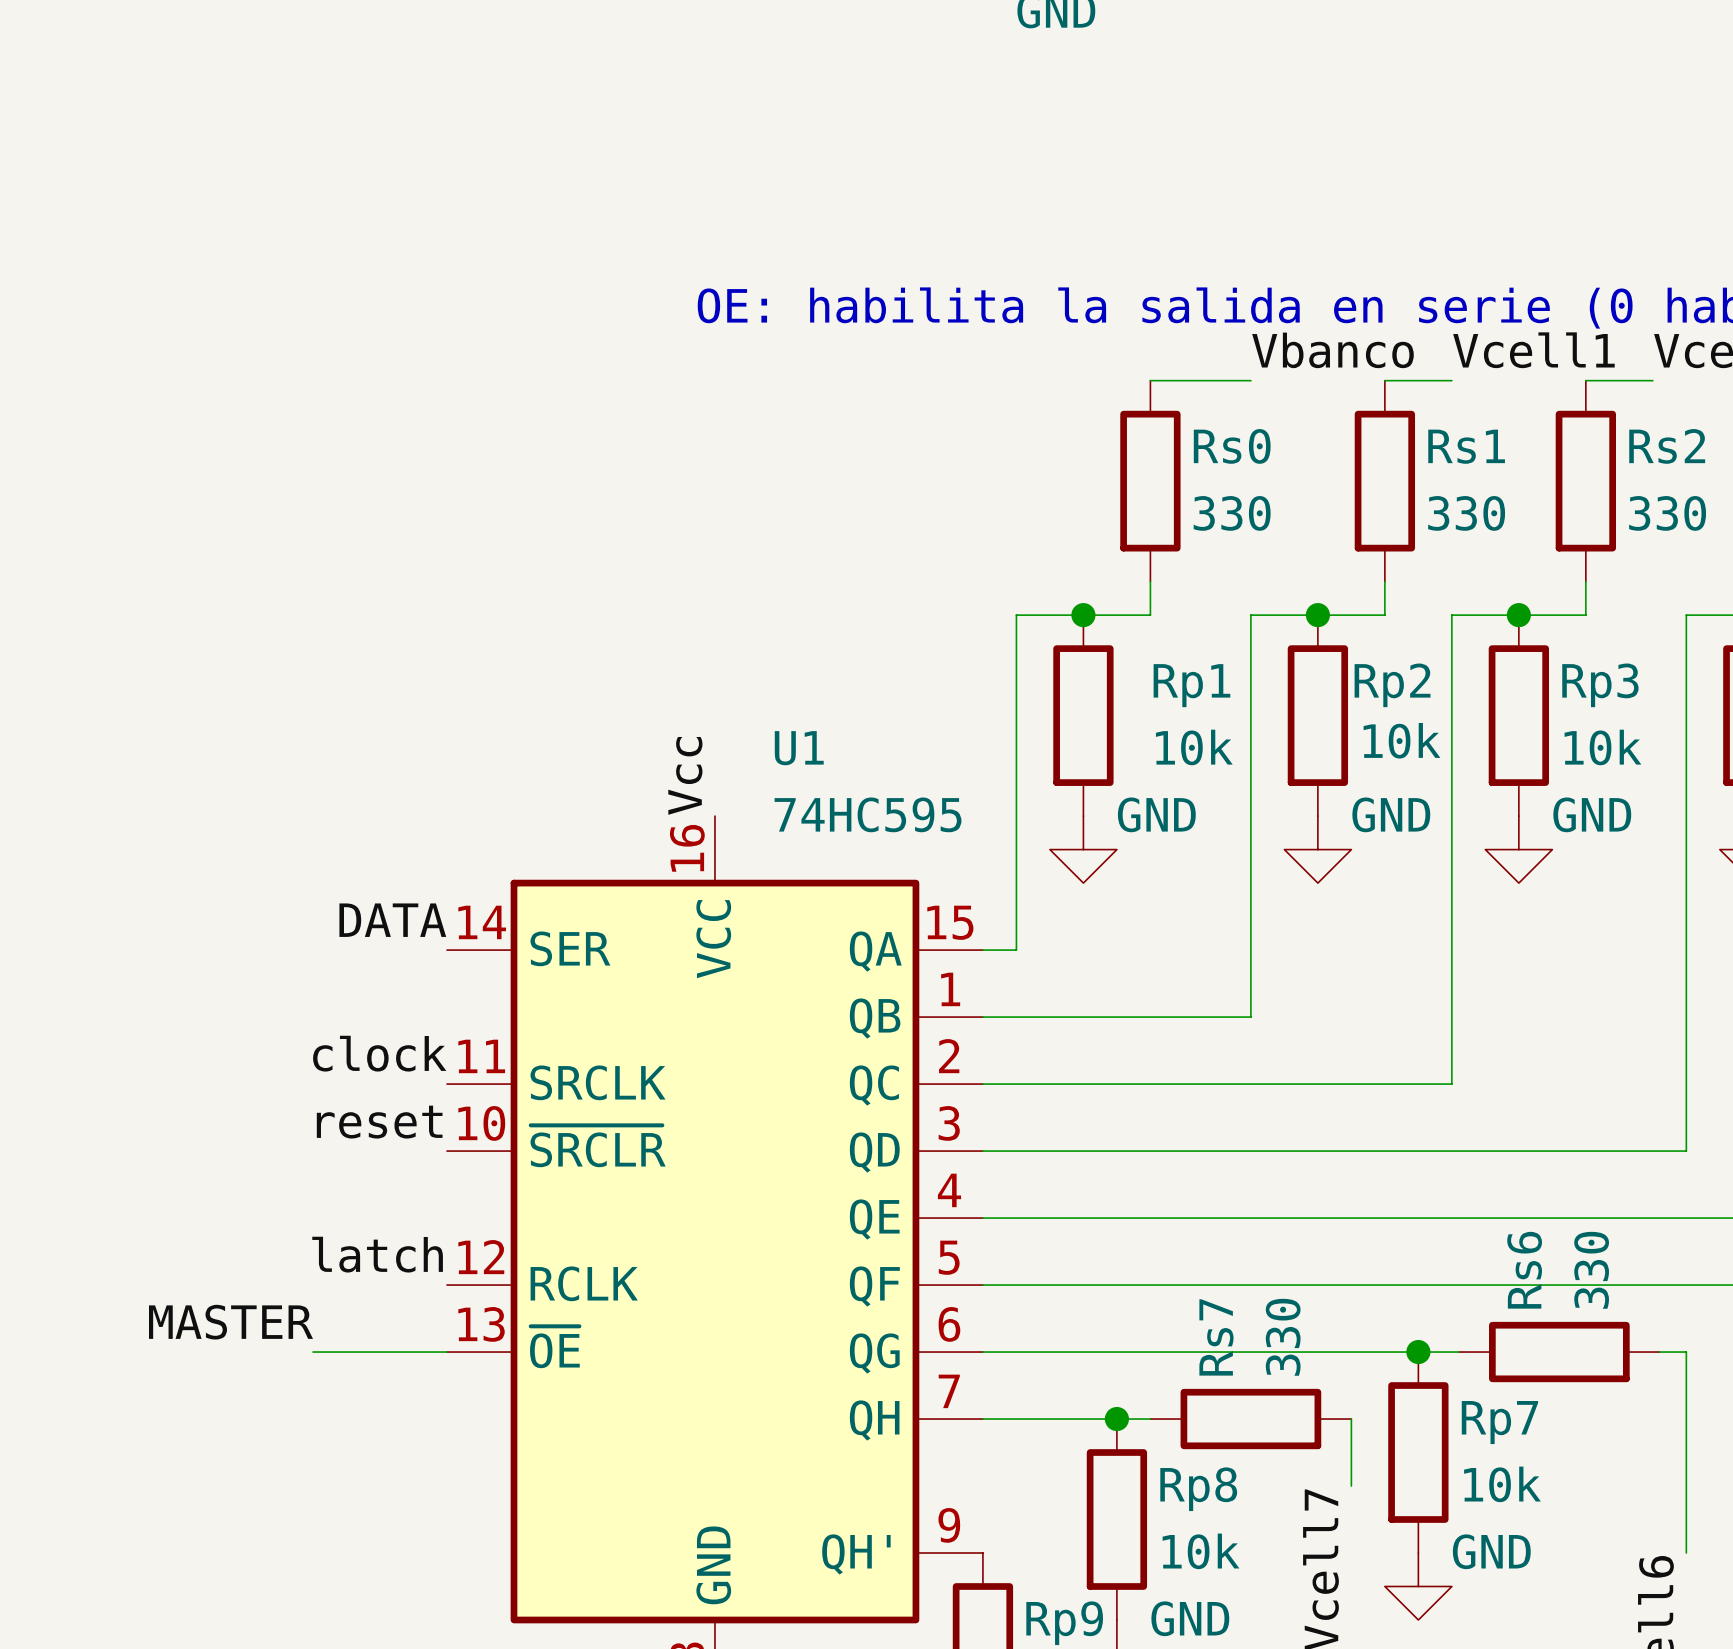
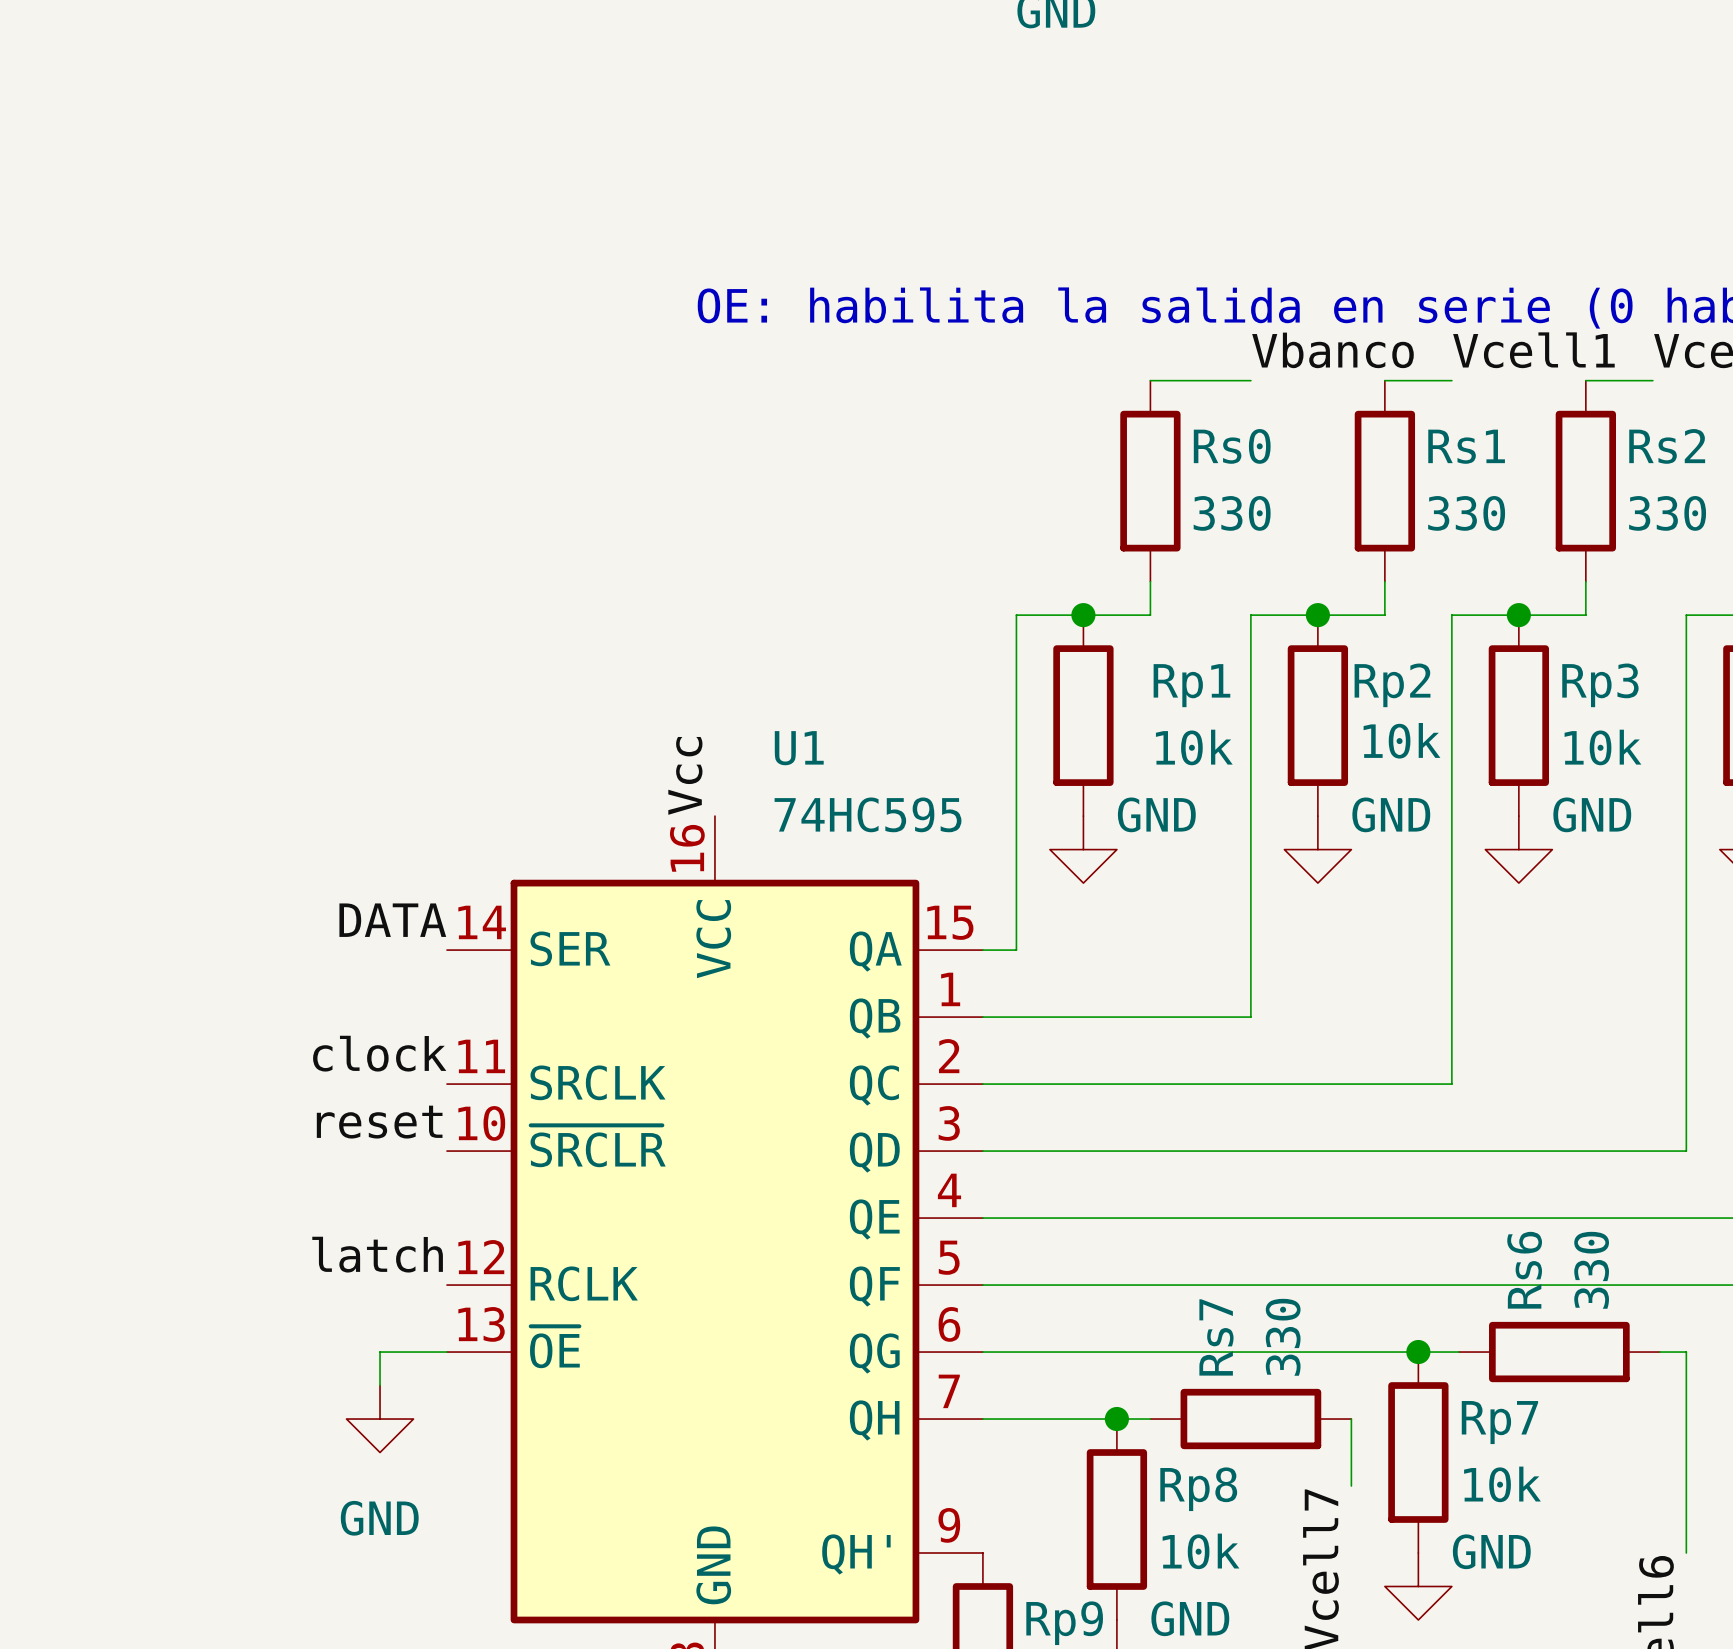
label: MASTER (231, 1322) -> none
wire: (313, 1352) (380, 1352) -> (380, 1385) (380, 1352)
power symbol: none -> GND (380, 1419)

